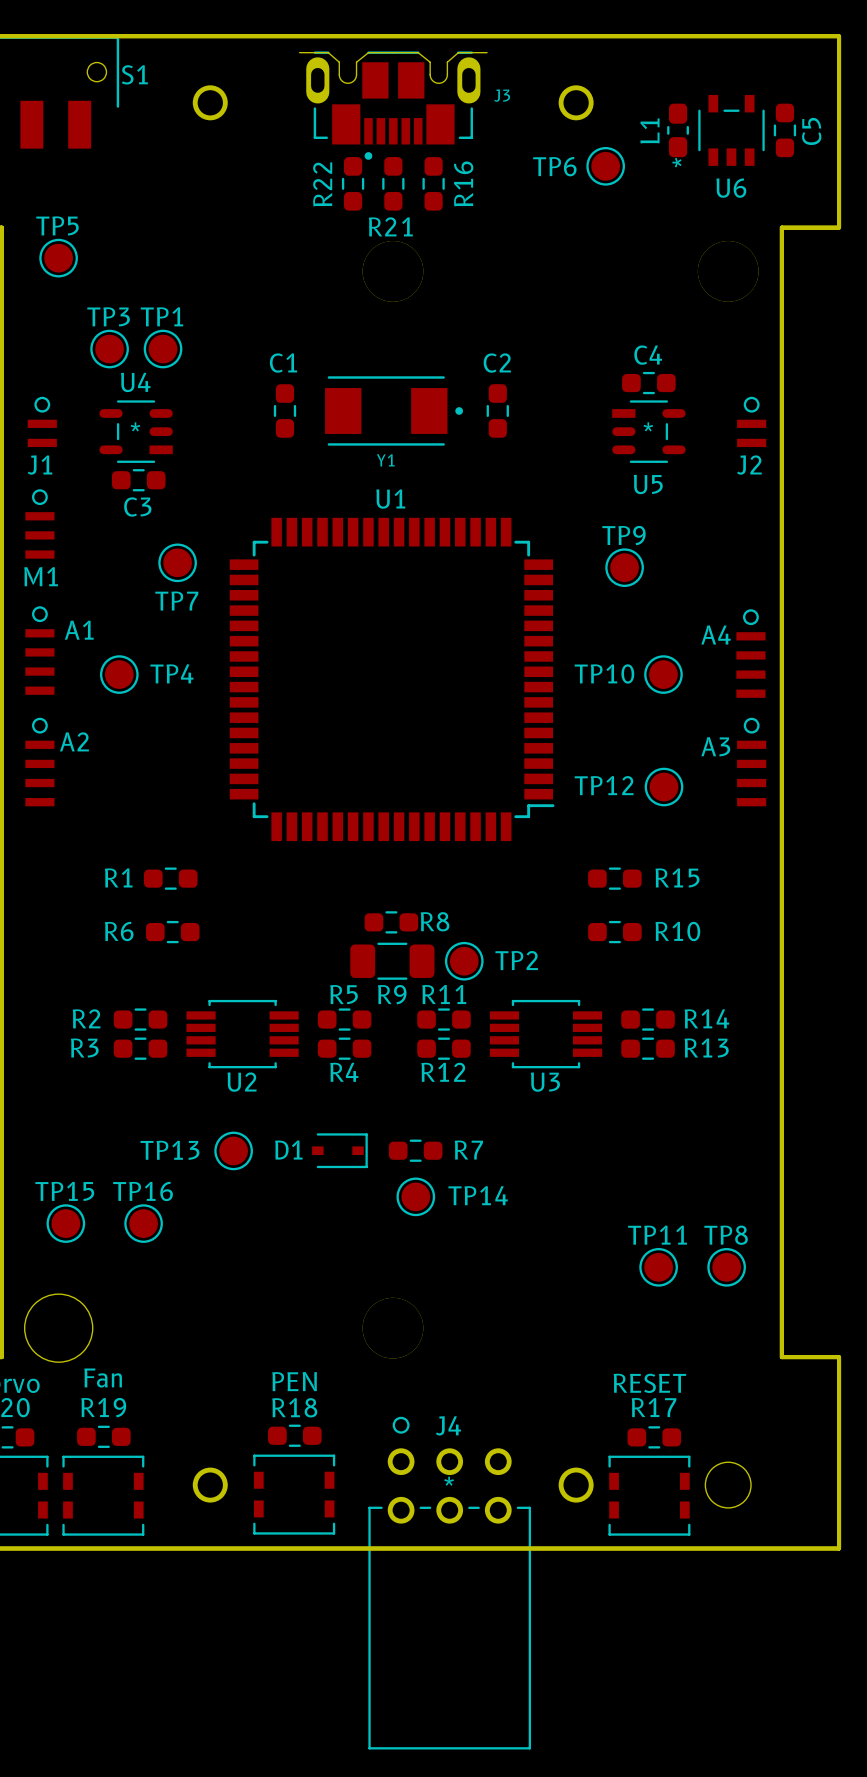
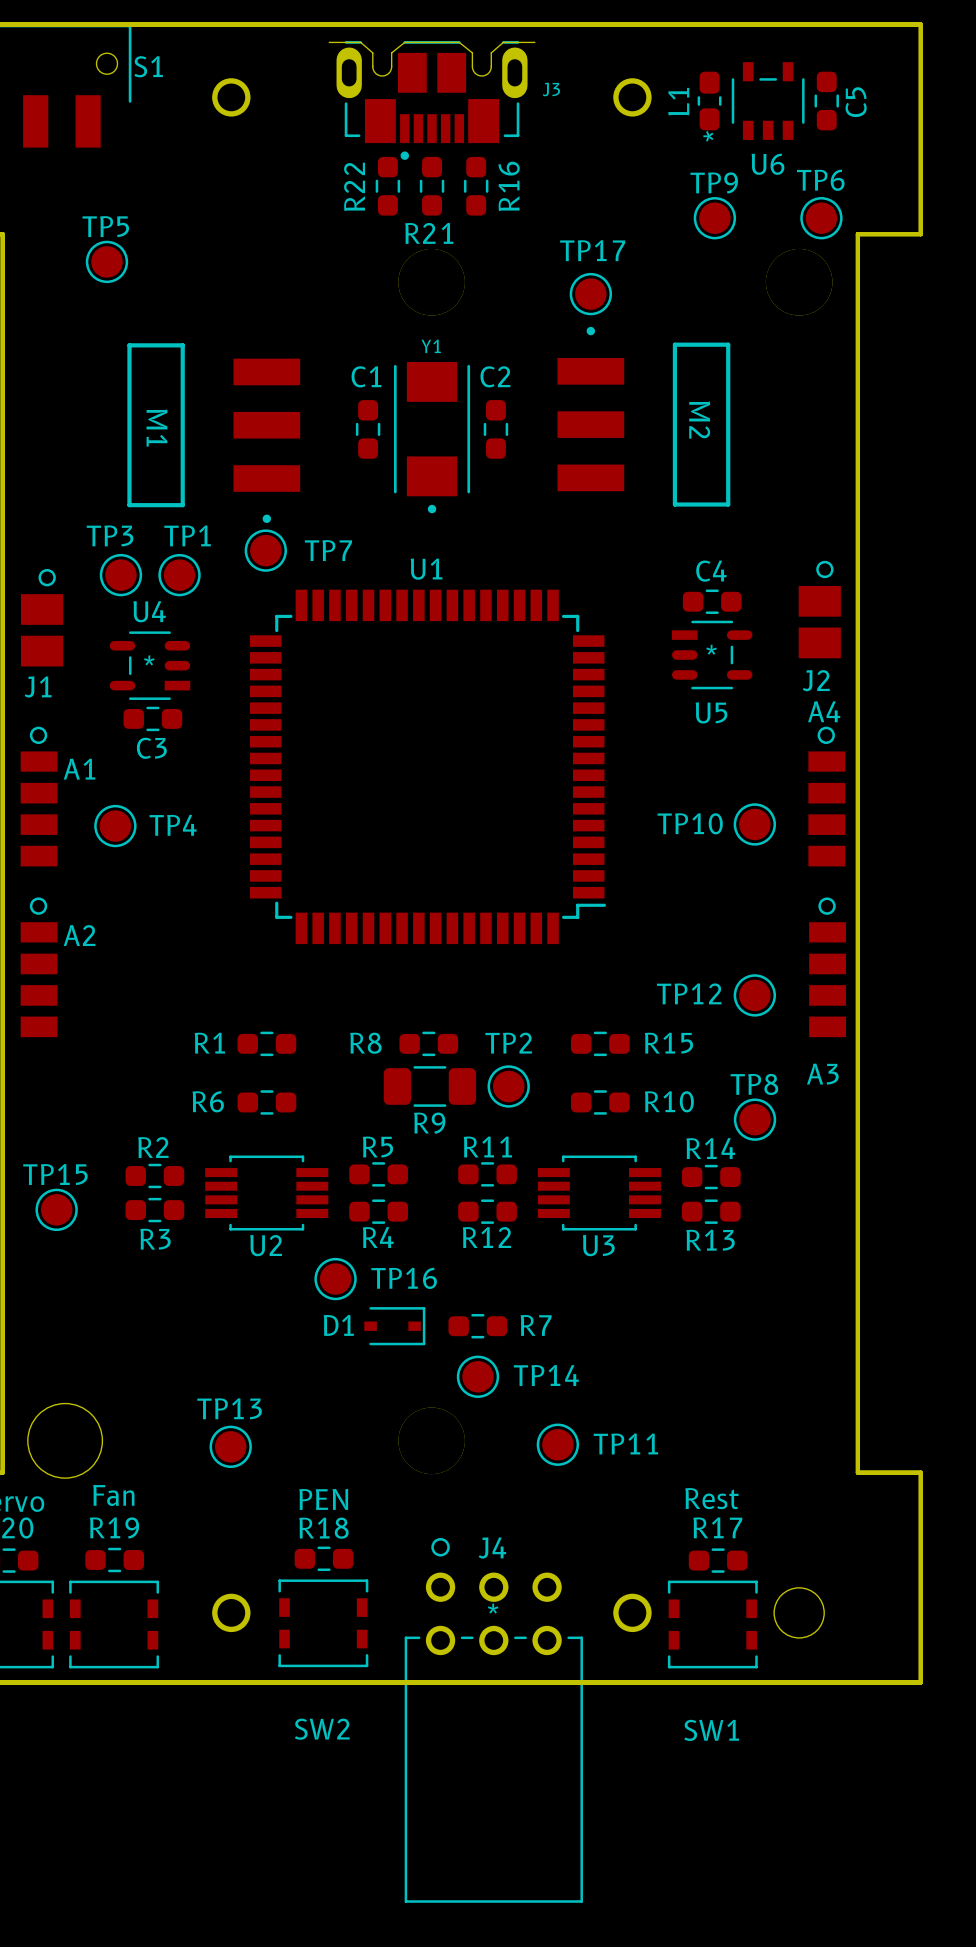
L1 position: (678, 130) -> (709, 101)
U6 position: (731, 130) -> (768, 101)
C5 position: (784, 130) -> (826, 101)
TP6 name position: TP6 (554, 166) -> TP6 (820, 180)
TP6 position: (605, 166) -> (821, 218)
TP5 position: (58, 258) -> (106, 261)
TP17: none -> (590, 294)
TP3 name position: TP3 (108, 316) -> TP3 (110, 535)
TP1 name position: TP1 (161, 316) -> TP1 (187, 535)
TP3 position: (109, 349) -> (120, 575)
TP1 position: (163, 349) -> (179, 575)
C4 position: (648, 383) -> (712, 601)
M2: none -> (643, 416)
J1 footprint: [27, 396, 57, 448] -> [20, 569, 64, 667]
J2 footprint: [737, 396, 767, 448] -> [798, 560, 841, 659]
C1 position: (284, 410) -> (368, 429)
Y1 rotation: 0° (394, 410) -> 90° clockwise (432, 437)
C2 position: (497, 410) -> (495, 429)
U4 position: (136, 431) -> (149, 665)
U5 position: (648, 431) -> (712, 655)
Y1 name position: Y1 (385, 460) -> Y1 (431, 346)
C3 position: (138, 480) -> (152, 718)
M1 footprint: [25, 489, 55, 559] -> [127, 343, 301, 523]
TP7 position: (177, 562) -> (265, 550)
TP9 position: (624, 567) -> (714, 218)
M1 name position: M1 (41, 576) -> M1 (157, 428)
TP7 name position: TP7 (176, 601) -> TP7 (328, 550)
A1 footprint: [25, 606, 55, 695] -> [20, 726, 58, 867]
A4 footprint: [736, 609, 766, 698] -> [808, 726, 846, 867]
A4 name position: A4 (716, 634) -> A4 (824, 711)
TP4 position: (119, 674) -> (115, 826)
TP10 position: (663, 674) -> (754, 824)
U1 position: (392, 679) -> (428, 766)
A2 footprint: [25, 717, 55, 807] -> [20, 897, 58, 1038]
A3 footprint: [737, 717, 767, 807] -> [809, 897, 846, 1038]
A3 name position: A3 (715, 746) -> A3 (822, 1074)
TP12 position: (664, 787) -> (754, 995)
R1 position: (170, 878) -> (266, 1043)
R15 position: (614, 878) -> (600, 1043)
R8 name position: R8 (435, 921) -> R8 (365, 1043)
R9 position: (391, 922) -> (428, 1043)
R6 position: (172, 932) -> (266, 1102)
R10 position: (614, 932) -> (600, 1102)
TP2 name position: TP2 (516, 960) -> TP2 (508, 1043)
R8 position: (392, 961) -> (429, 1086)
TP2 position: (464, 961) -> (508, 1086)
R2 name position: R2 (86, 1018) -> R2 (153, 1147)
R14 name position: R14 (706, 1018) -> R14 (710, 1148)
R2 position: (140, 1019) -> (154, 1175)
R5 position: (344, 1019) -> (378, 1174)
R11 position: (443, 1019) -> (487, 1174)
R14 position: (648, 1019) -> (711, 1177)
U2 position: (242, 1034) -> (266, 1193)
U3 position: (546, 1034) -> (599, 1193)
R13 name position: R13 (706, 1047) -> R13 (710, 1240)
R3 name position: R3 (84, 1048) -> R3 (155, 1239)
R3 position: (140, 1048) -> (154, 1210)
R4 position: (344, 1048) -> (378, 1211)
R12 position: (443, 1048) -> (487, 1211)
R13 position: (648, 1048) -> (711, 1211)
TP13 name position: TP13 (169, 1150) -> TP13 (229, 1408)
TP13 position: (233, 1150) -> (230, 1446)
D1 position: (339, 1150) -> (394, 1326)
R7 position: (415, 1150) -> (477, 1326)
TP16 name position: TP16 (143, 1191) -> TP16 (404, 1278)
TP14 position: (415, 1196) -> (477, 1376)
TP15 position: (65, 1223) -> (56, 1209)
TP16 position: (143, 1223) -> (335, 1279)
TP11 name position: TP11 (657, 1235) -> TP11 (625, 1443)
TP11 position: (658, 1267) -> (557, 1444)
TP8 position: (726, 1267) -> (755, 1119)
SW1 value: RESET (649, 1383) -> Rest (712, 1498)
SW2 name: none -> SW2 (322, 1729)
SW1 name: none -> SW1 (711, 1730)

